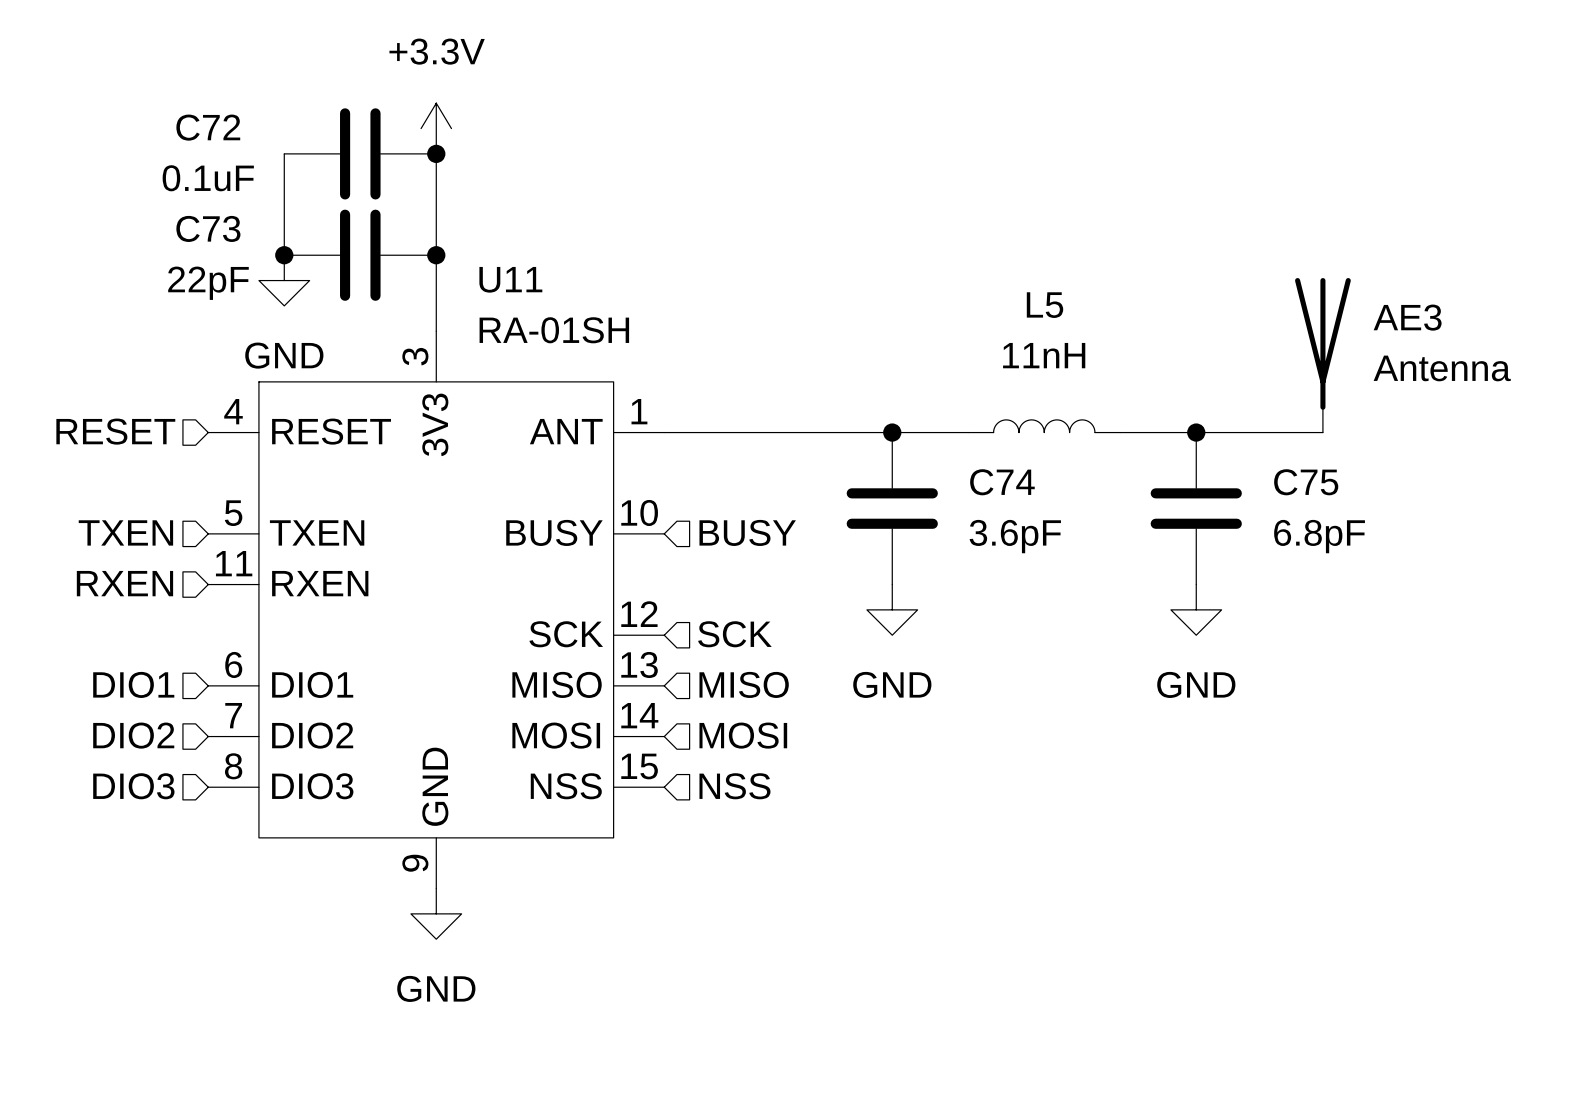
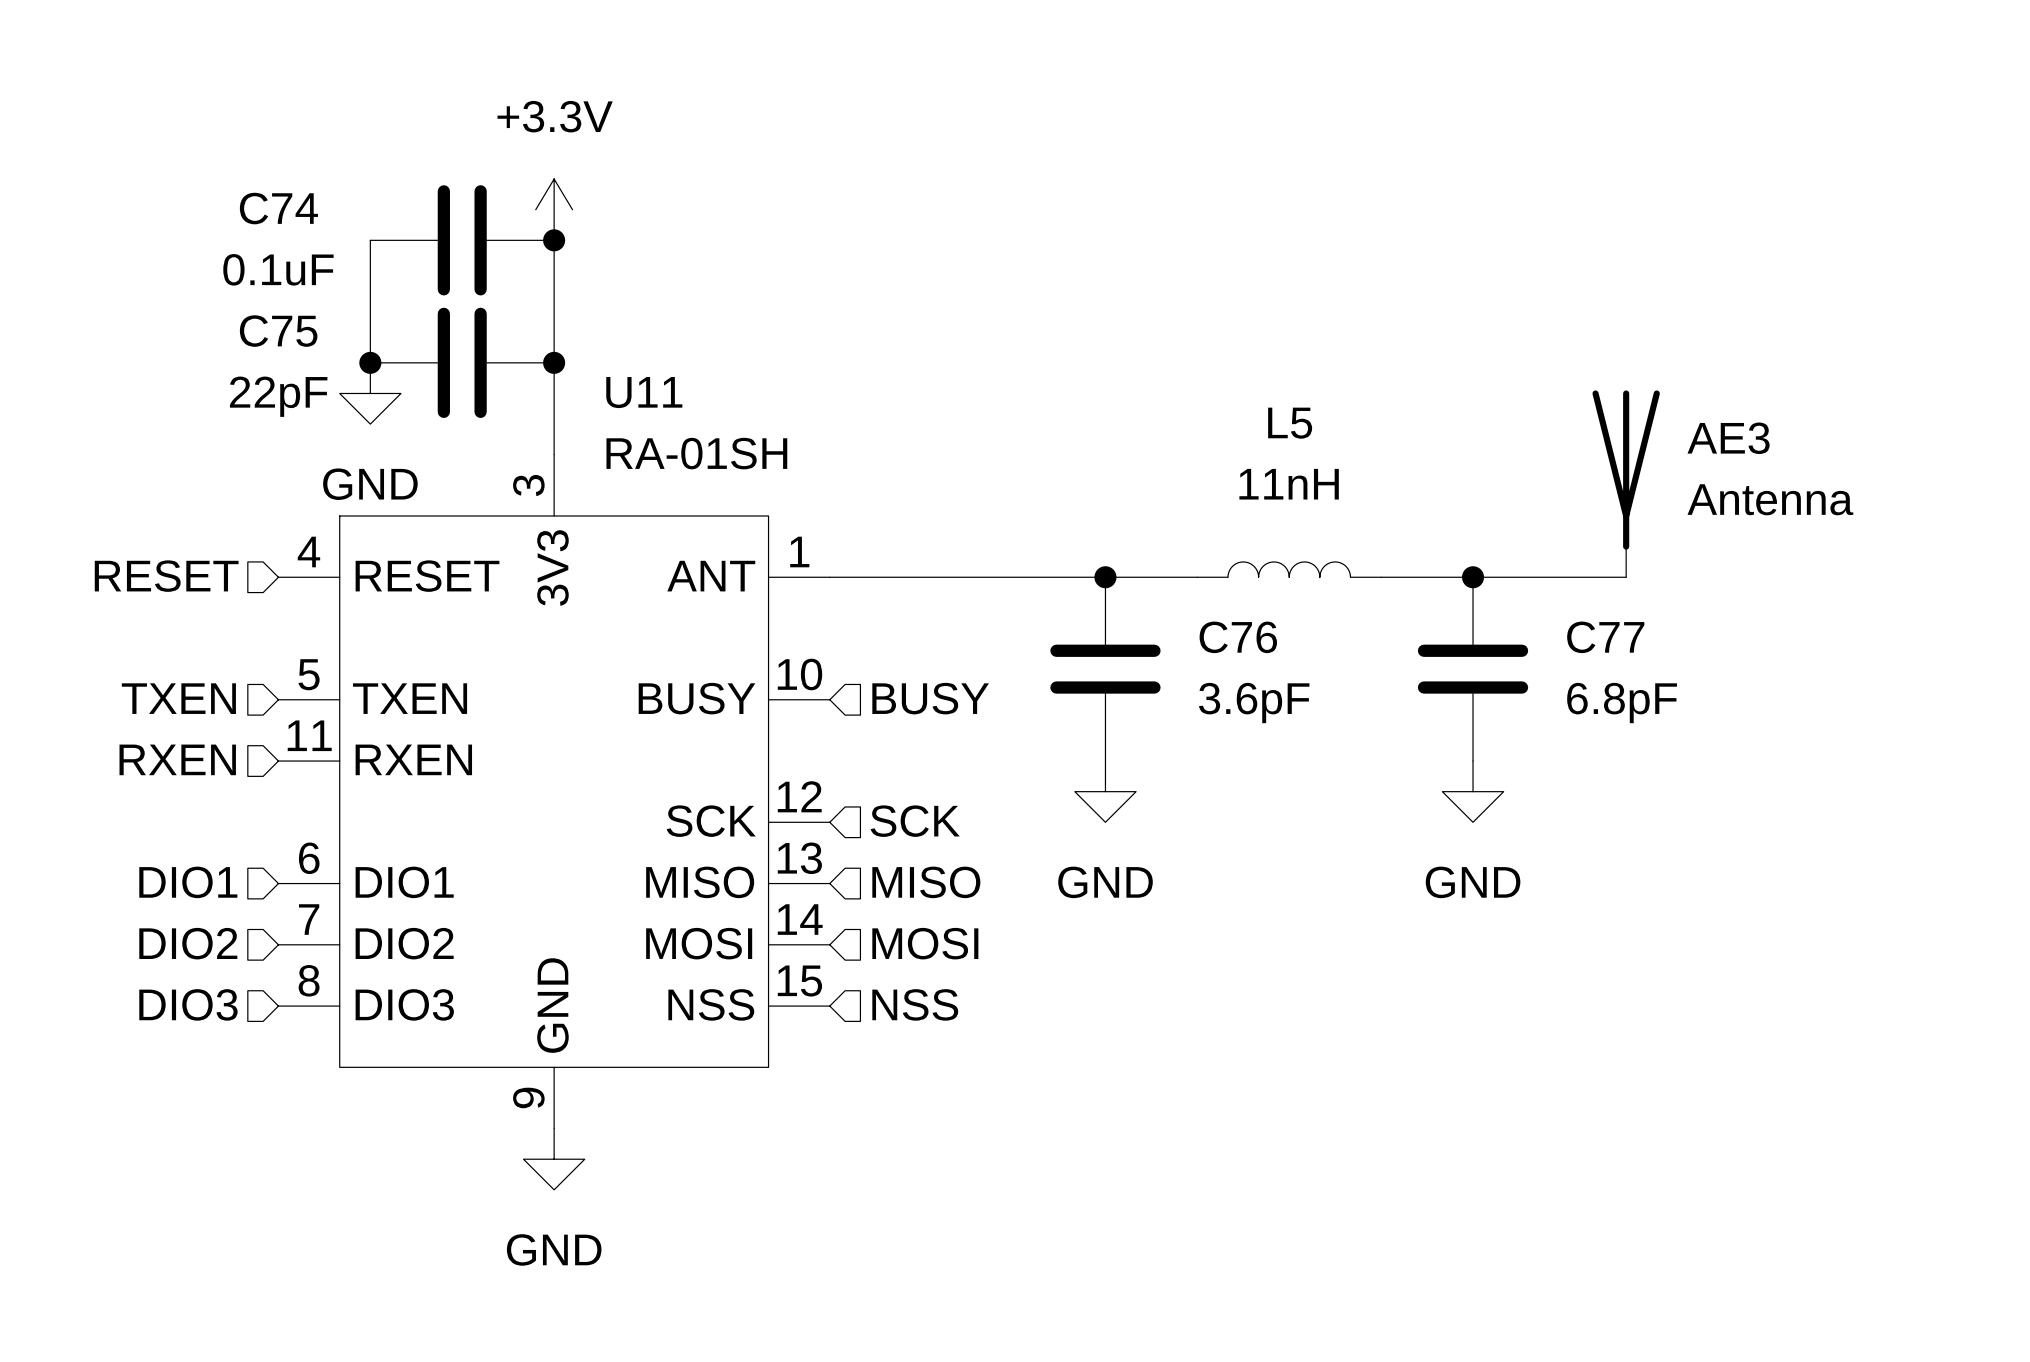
C72 name: C72 (208, 127) -> C74 (278, 208)
C73 name: C73 (208, 228) -> C75 (278, 331)
C74 name: C74 (1002, 482) -> C76 (1238, 637)
C75 name: C75 (1306, 482) -> C77 (1605, 637)

